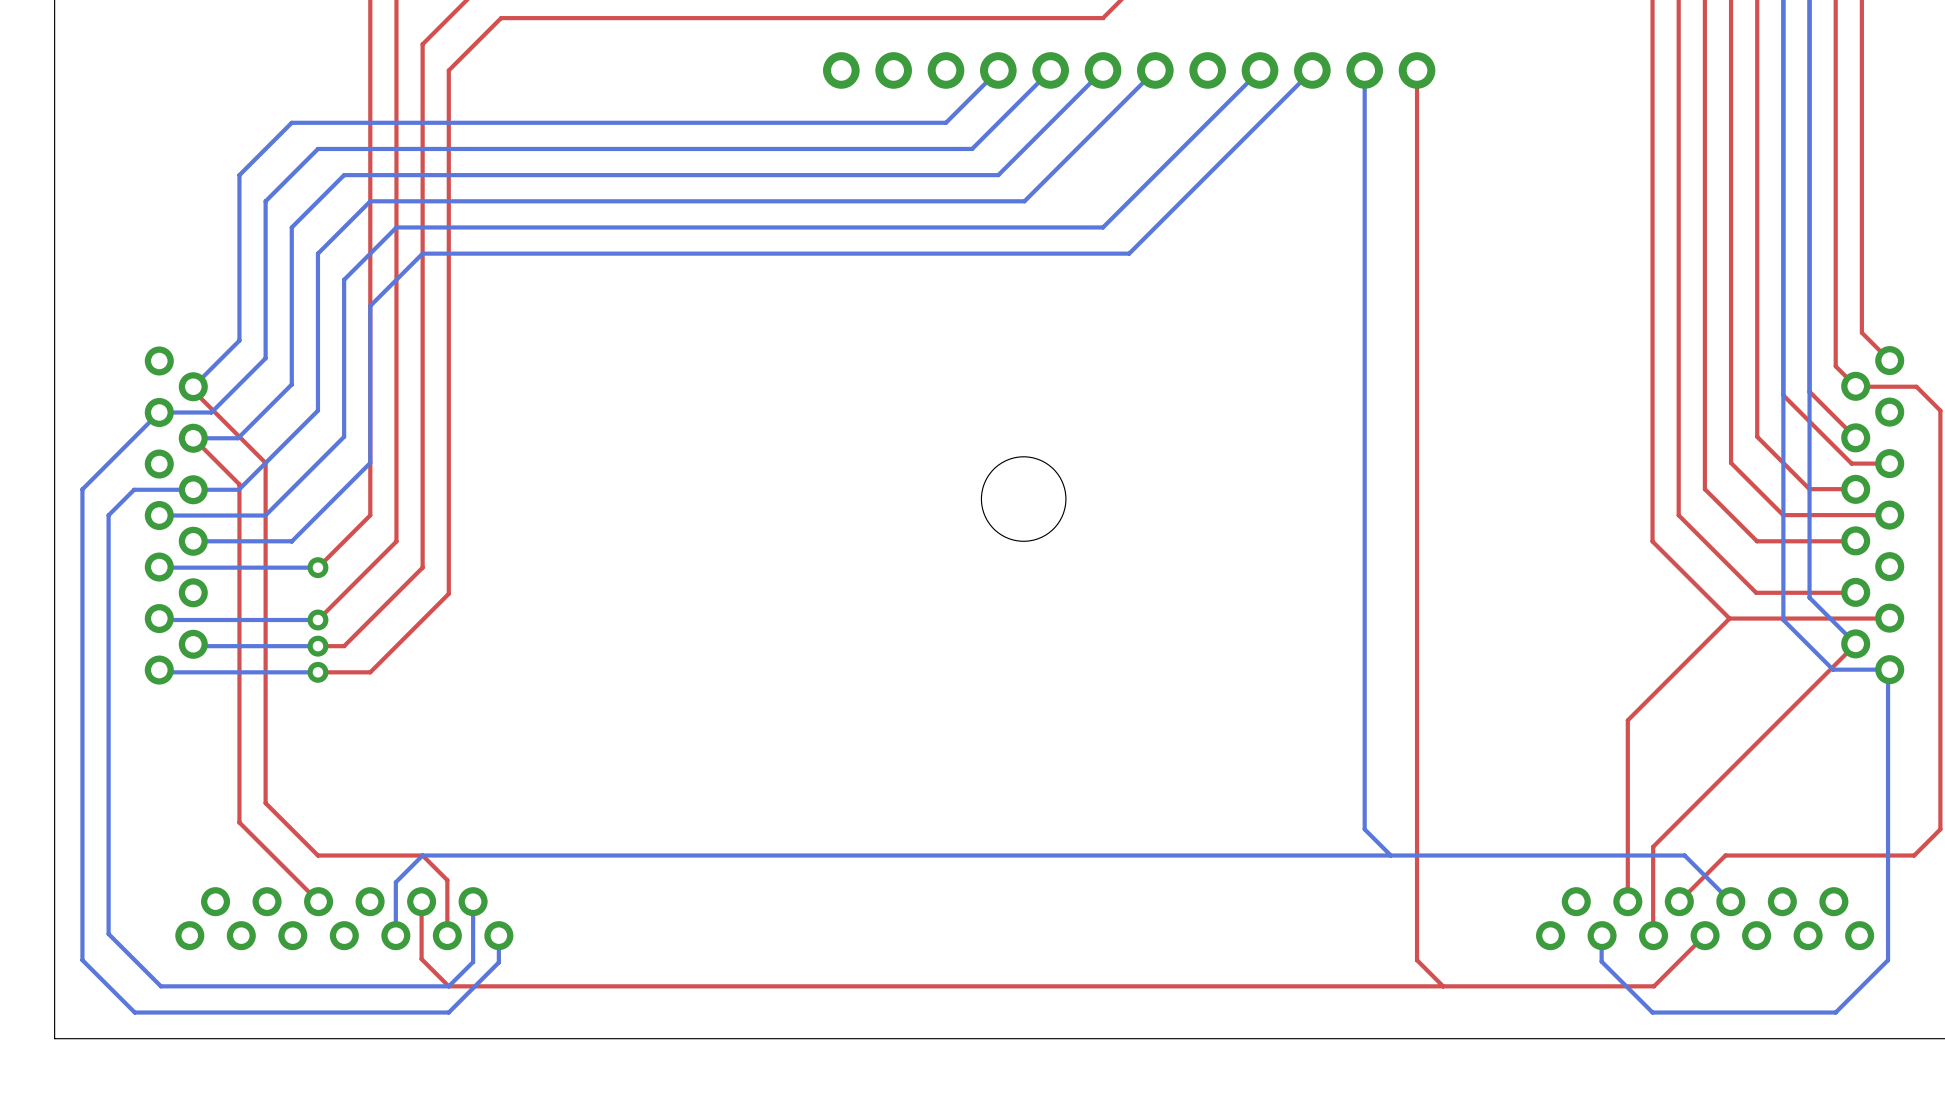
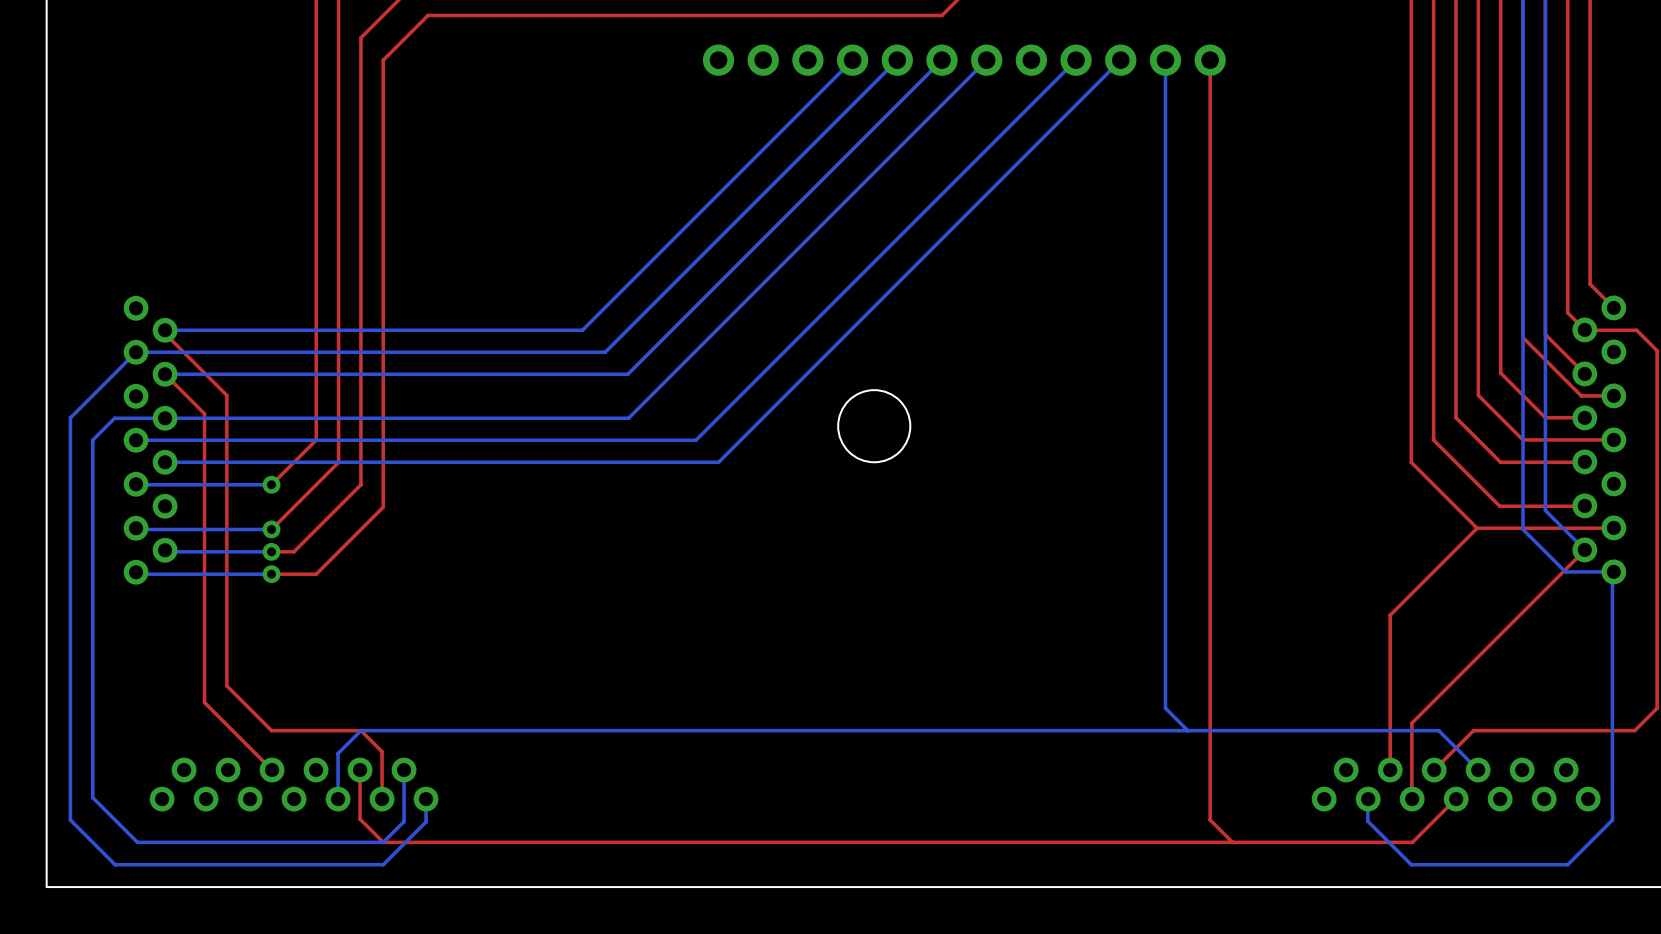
bottom track: (945, 122) (291, 122) (239, 175) (239, 340) (193, 386) -> (807, 104) (582, 330) (165, 330)
bottom track: (972, 148) (317, 148) (265, 201) (265, 358) (211, 412) -> (830, 127) (605, 352) (180, 352)
bottom track: (998, 175) (344, 175) (291, 227) (291, 384) (238, 438) -> (852, 149) (627, 374) (203, 374)
bottom track: (1024, 201) (370, 201) (317, 253) (317, 410) (238, 489) -> (874, 171) (628, 418) (203, 418)
bottom track: (1103, 227) (396, 227) (344, 279) (344, 436) (265, 515) -> (941, 194) (695, 440) (226, 440)
bottom track: (1129, 253) (422, 253) (370, 305) (370, 462) (291, 541) -> (964, 216) (718, 462) (249, 462)

